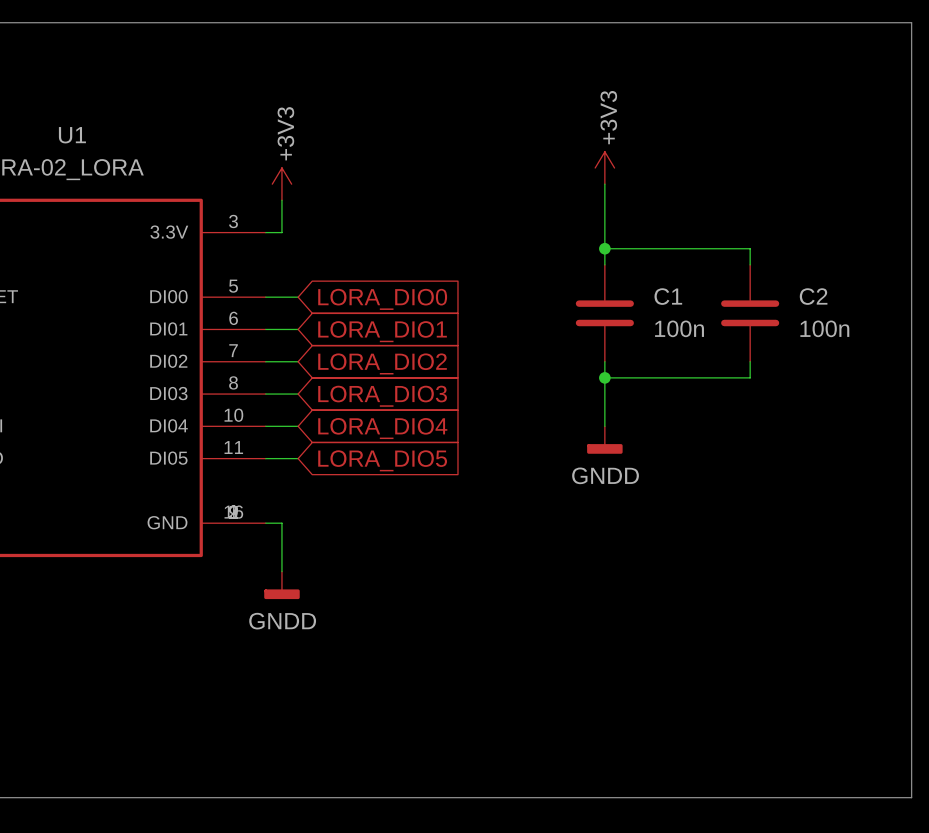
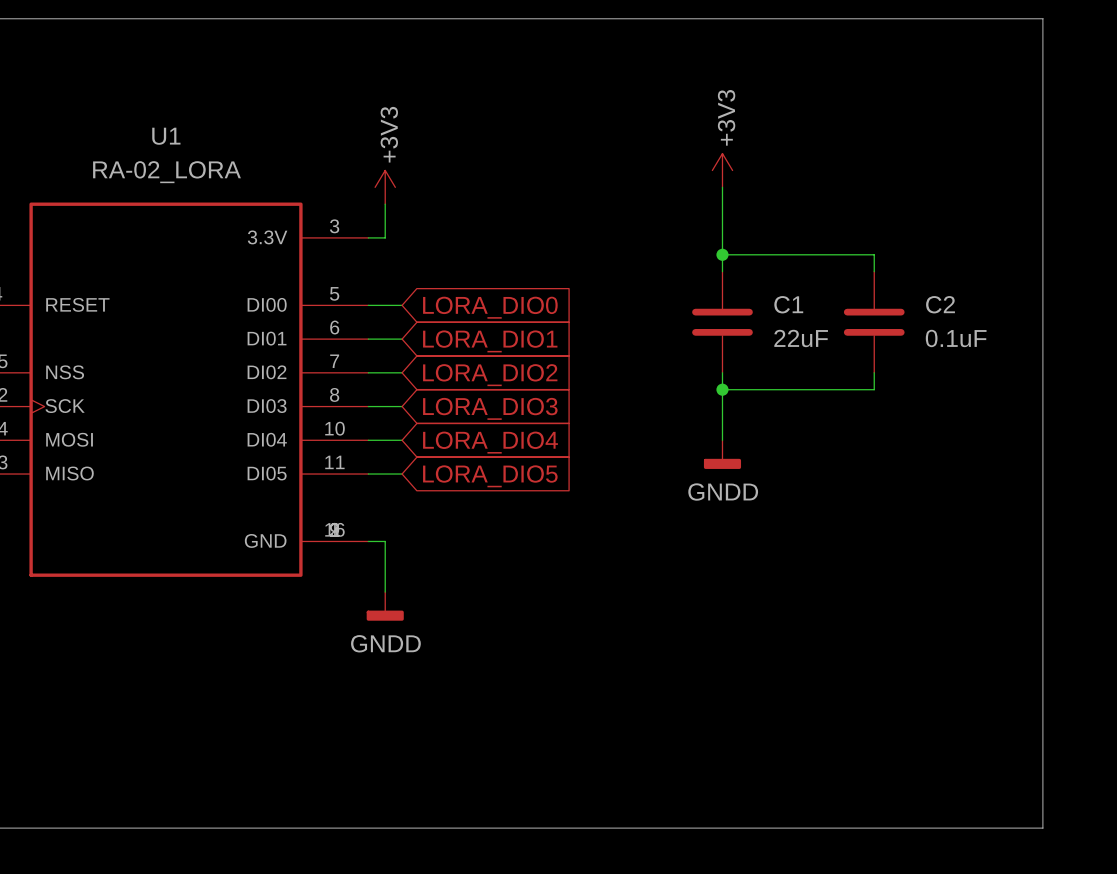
C1 value: 100n (679, 328) -> 22uF (801, 338)
C2 value: 100n (824, 328) -> 0.1uF (956, 338)

